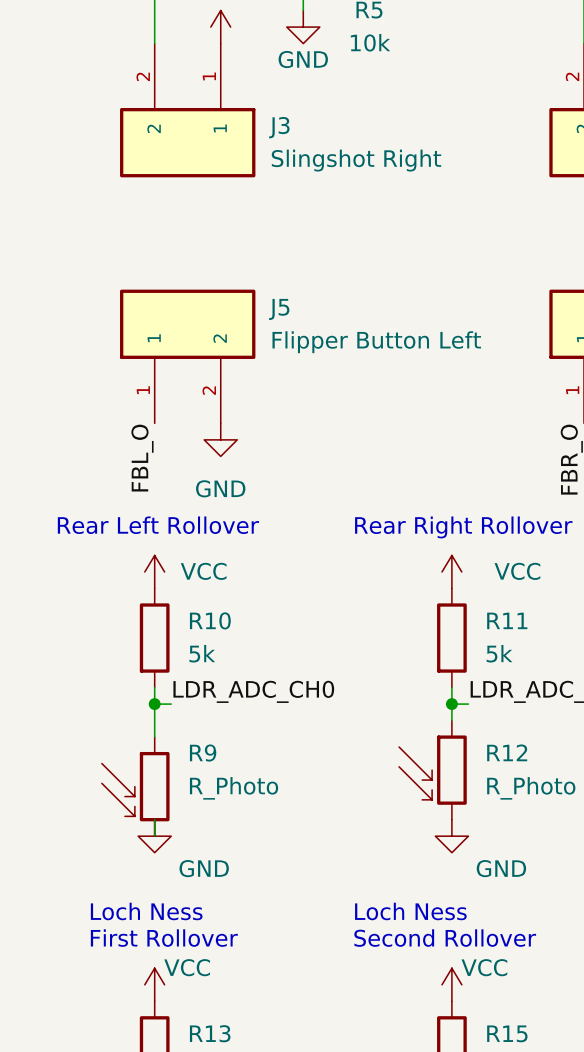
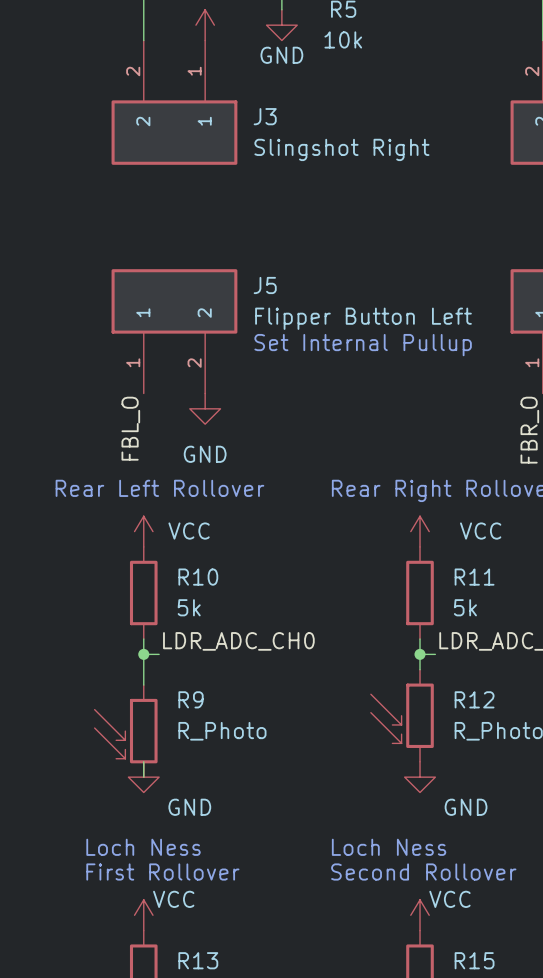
text: none -> Set Internal Pullup (363, 345)

